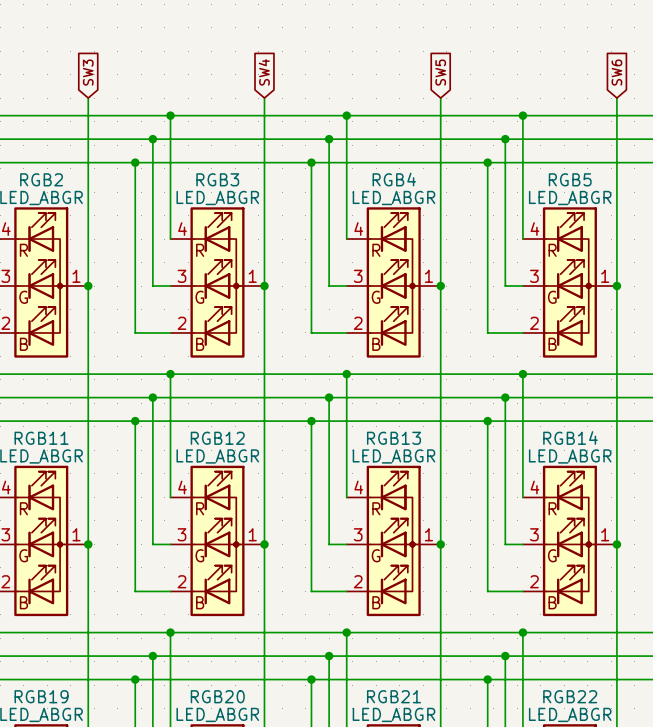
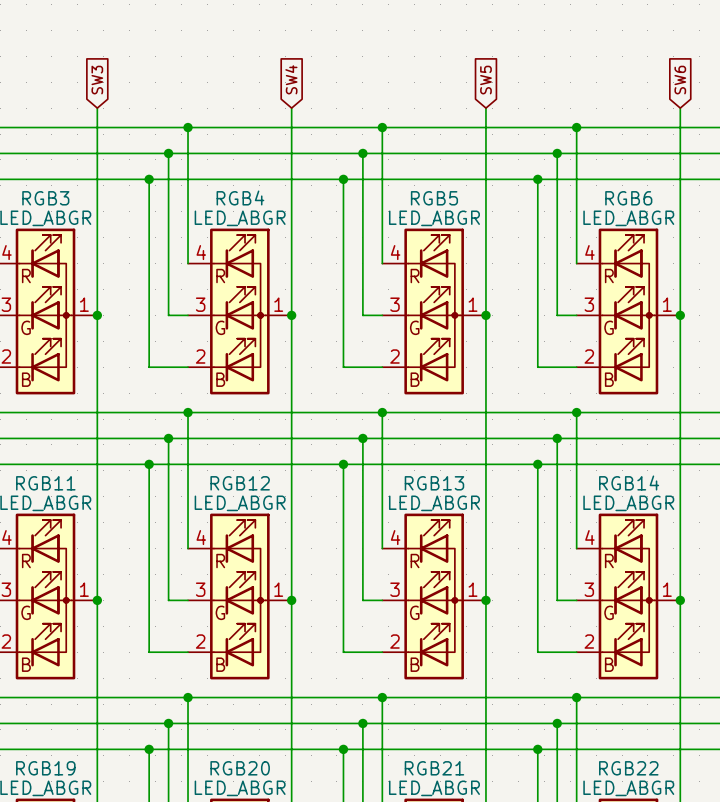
RGB2 name: RGB2 (41, 179) -> RGB3 (45, 198)
RGB3 name: RGB3 (217, 179) -> RGB4 (240, 197)
RGB4 name: RGB4 (394, 179) -> RGB5 (434, 198)
RGB5 name: RGB5 (570, 179) -> RGB6 (628, 198)

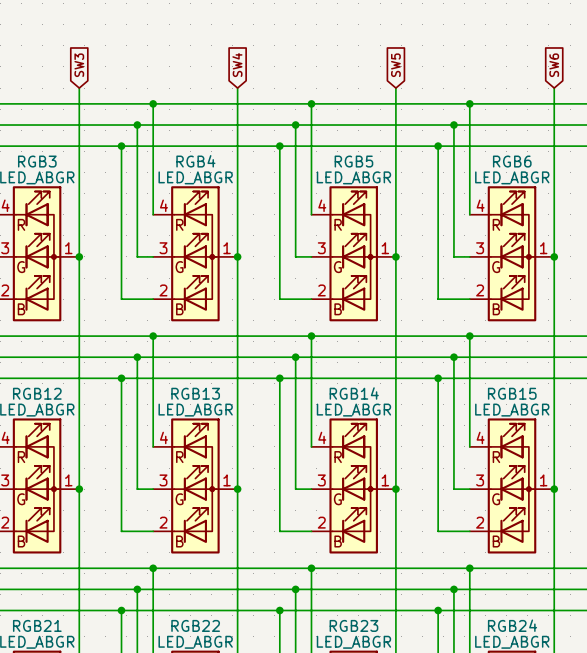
RGB11 name: RGB11 (45, 483) -> RGB12 (37, 393)
RGB12 name: RGB12 (240, 483) -> RGB13 (195, 393)
RGB13 name: RGB13 (434, 483) -> RGB14 (354, 393)
RGB14 name: RGB14 (629, 483) -> RGB15 (512, 393)
RGB19 name: RGB19 (45, 768) -> RGB21 (37, 625)
RGB20 name: RGB20 (240, 768) -> RGB22 (195, 625)
RGB21 name: RGB21 (434, 768) -> RGB23 (353, 625)
RGB22 name: RGB22 (628, 768) -> RGB24 (512, 625)

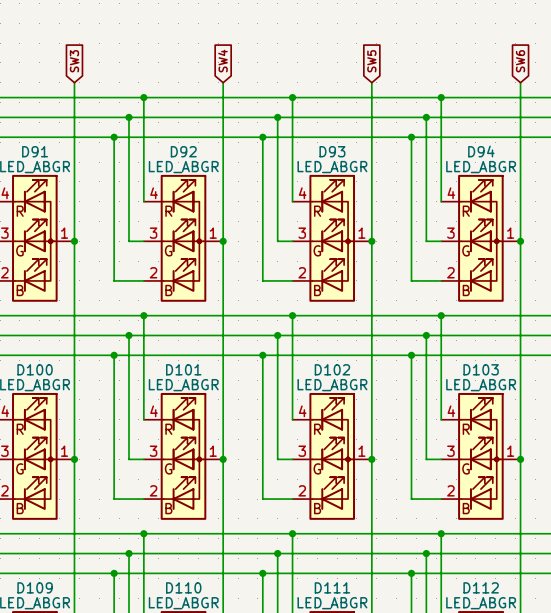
RGB3 name: RGB3 (37, 161) -> D91 (35, 151)
RGB4 name: RGB4 (195, 161) -> D92 (183, 151)
RGB5 name: RGB5 (353, 161) -> D93 (332, 151)
RGB6 name: RGB6 (512, 161) -> D94 (481, 151)
RGB12 name: RGB12 (37, 393) -> D100 (35, 369)
RGB13 name: RGB13 (195, 393) -> D101 (183, 369)
RGB14 name: RGB14 (354, 393) -> D102 (332, 369)
RGB15 name: RGB15 (512, 393) -> D103 (481, 369)
RGB21 name: RGB21 (37, 625) -> D109 (35, 587)
RGB22 name: RGB22 (195, 625) -> D110 (183, 587)
RGB23 name: RGB23 (353, 625) -> D111 (332, 587)
RGB24 name: RGB24 (512, 625) -> D112 (481, 587)

